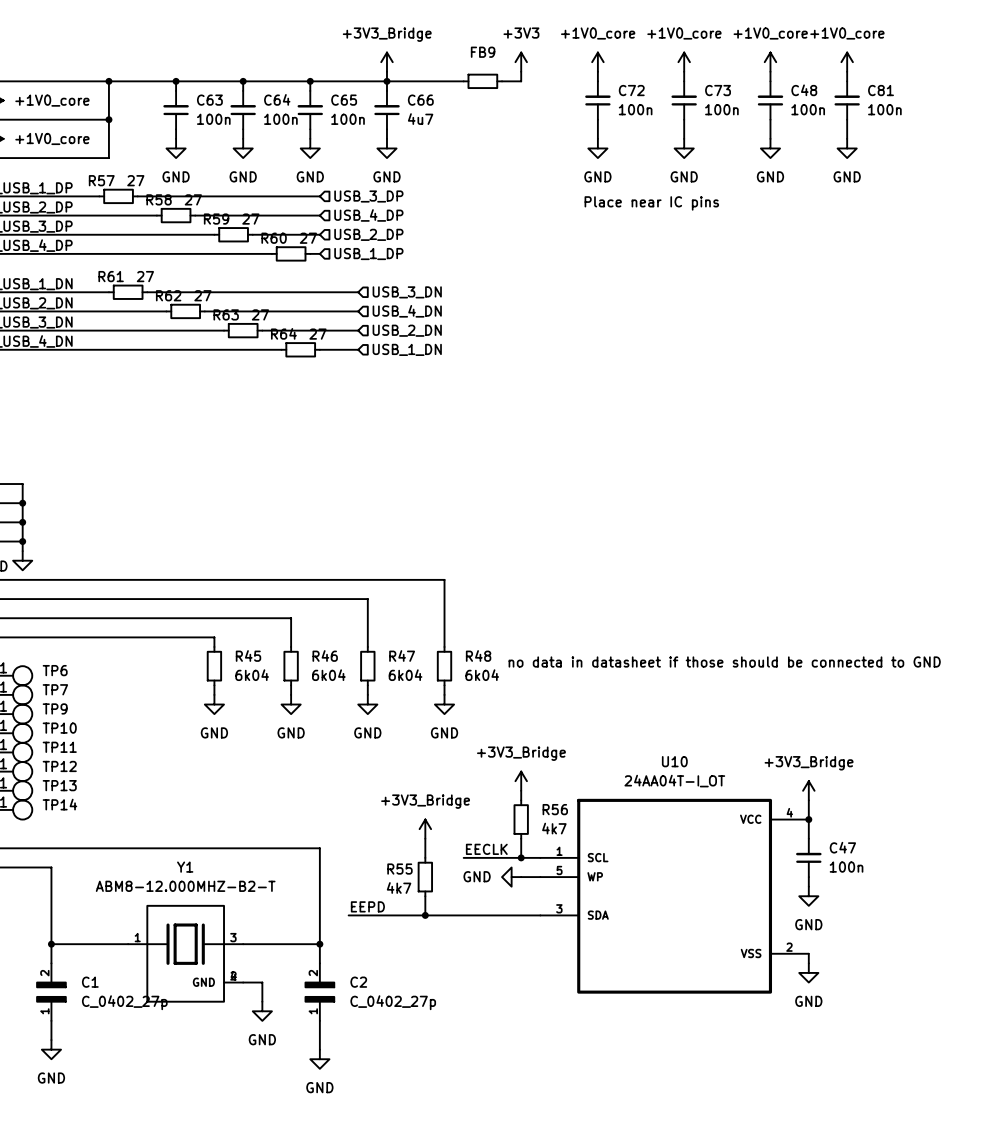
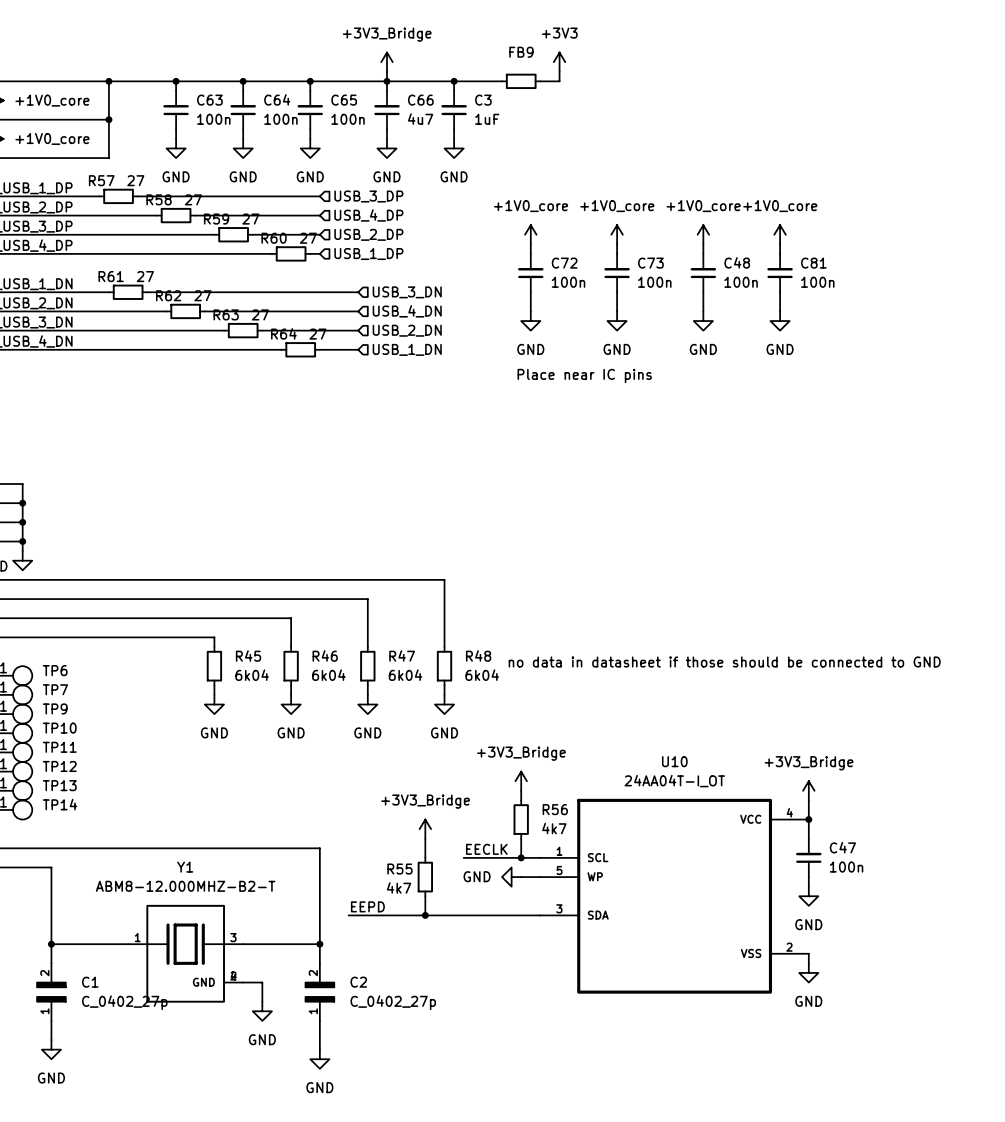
power symbol position: +3V3 (521, 62) -> +3V3 (559, 62)
power symbol: +1V0_core (597, 62) -> none
power symbol: +1V0_core (684, 62) -> none
power symbol: +1V0_core (770, 62) -> none
power symbol: +1V0_core (847, 62) -> none
wire: (521, 71) (521, 81) (502, 81) -> (463, 81) (502, 81)
wire: none -> (559, 71) (559, 81) (540, 81)
wire: (597, 71) (597, 81) -> (530, 244) (530, 253)
wire: (684, 71) (684, 81) -> (617, 244) (617, 253)
wire: (770, 71) (770, 81) -> (703, 244) (703, 253)
wire: (847, 71) (847, 81) -> (780, 244) (780, 253)
wire: none -> (454, 81) (454, 90)
junction: none -> (454, 81)
FB9 position: (482, 81) -> (521, 81)
C72 position: (597, 100) -> (530, 273)
C73 position: (684, 100) -> (617, 273)
C48 position: (770, 100) -> (703, 273)
C81 position: (847, 100) -> (780, 273)
C3: none -> (454, 110)
wire: (597, 119) (597, 138) -> (530, 292) (530, 311)
wire: (684, 119) (684, 138) -> (617, 292) (617, 311)
wire: (770, 119) (770, 138) -> (703, 292) (703, 311)
wire: (847, 119) (847, 138) -> (780, 292) (780, 311)
wire: none -> (454, 129) (454, 138)
power symbol: none -> GND (454, 148)
power symbol: GND (597, 148) -> none
power symbol: GND (684, 148) -> none
power symbol: GND (770, 148) -> none
power symbol: GND (847, 148) -> none
text position: Place near IC pins (651, 203) -> Place near IC pins (584, 375)
power symbol: none -> +1V0_core (530, 234)
power symbol: none -> +1V0_core (617, 234)
power symbol: none -> +1V0_core (703, 234)
power symbol: none -> +1V0_core (780, 234)
power symbol: none -> GND (530, 321)
power symbol: none -> GND (617, 321)
power symbol: none -> GND (703, 321)
power symbol: none -> GND (780, 321)

